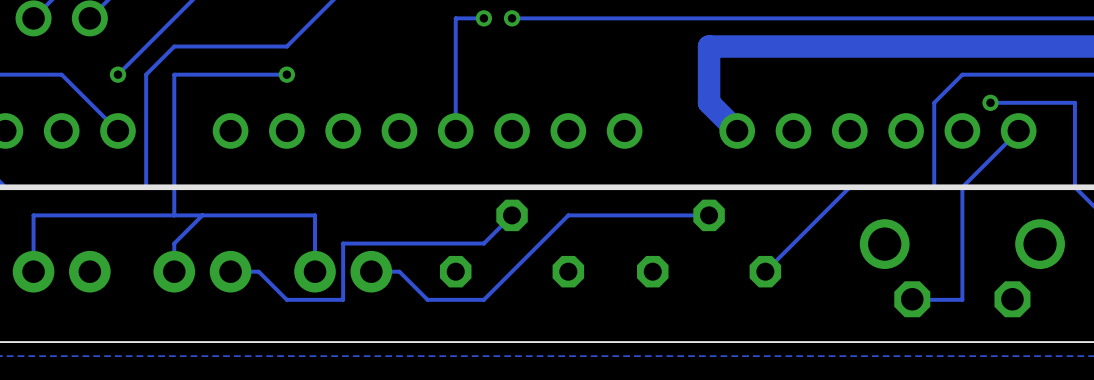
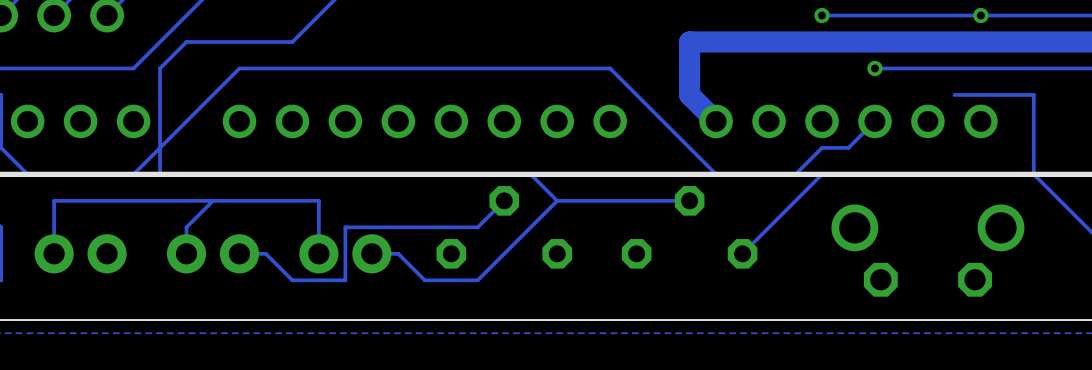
track: (483, 18) (455, 18) (455, 130) -> none
via: (483, 18) -> none
via: (512, 18) -> none
track: (849, 18) (512, 18) -> none
via: none -> (822, 15)
via: none -> (980, 15)
track: (61, 74) (117, 130) -> (80, 68) (133, 68)
via: (117, 74) -> none
track: (230, 74) (174, 74) (174, 215) -> (239, 68) (133, 174)
track: none -> (292, 68) (610, 68) (716, 174) (795, 174) (822, 147) (848, 147) (874, 121)
via: (286, 74) -> none
via: none -> (874, 68)
track: (962, 74) (934, 102) (934, 187) -> (927, 68) (874, 68)
via: (990, 102) -> none
track: (1018, 130) (962, 187) (962, 299) (906, 299) (912, 299) -> none
track: none -> (530, 174) (557, 200)

